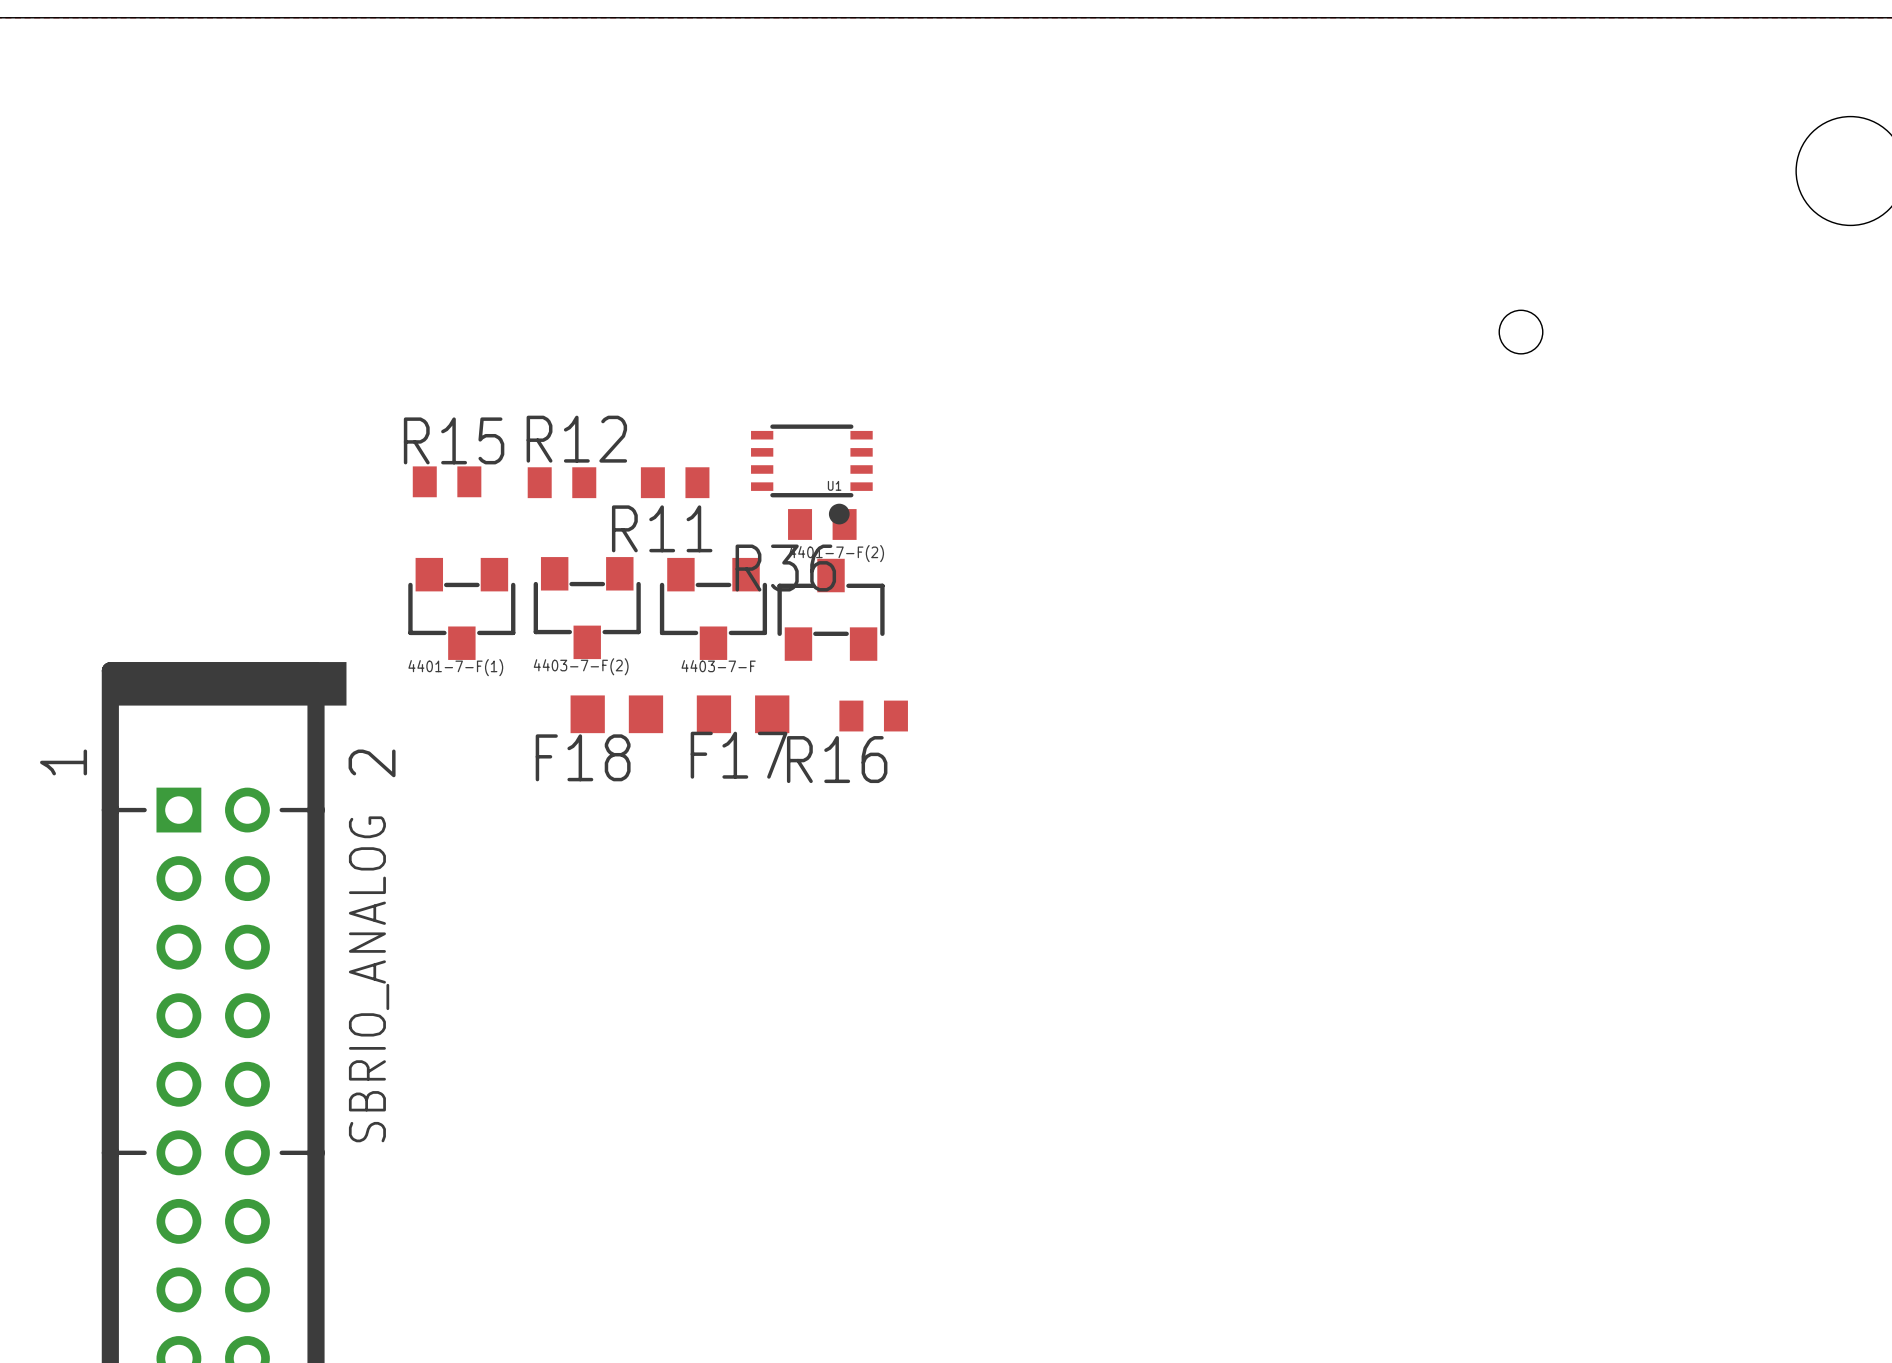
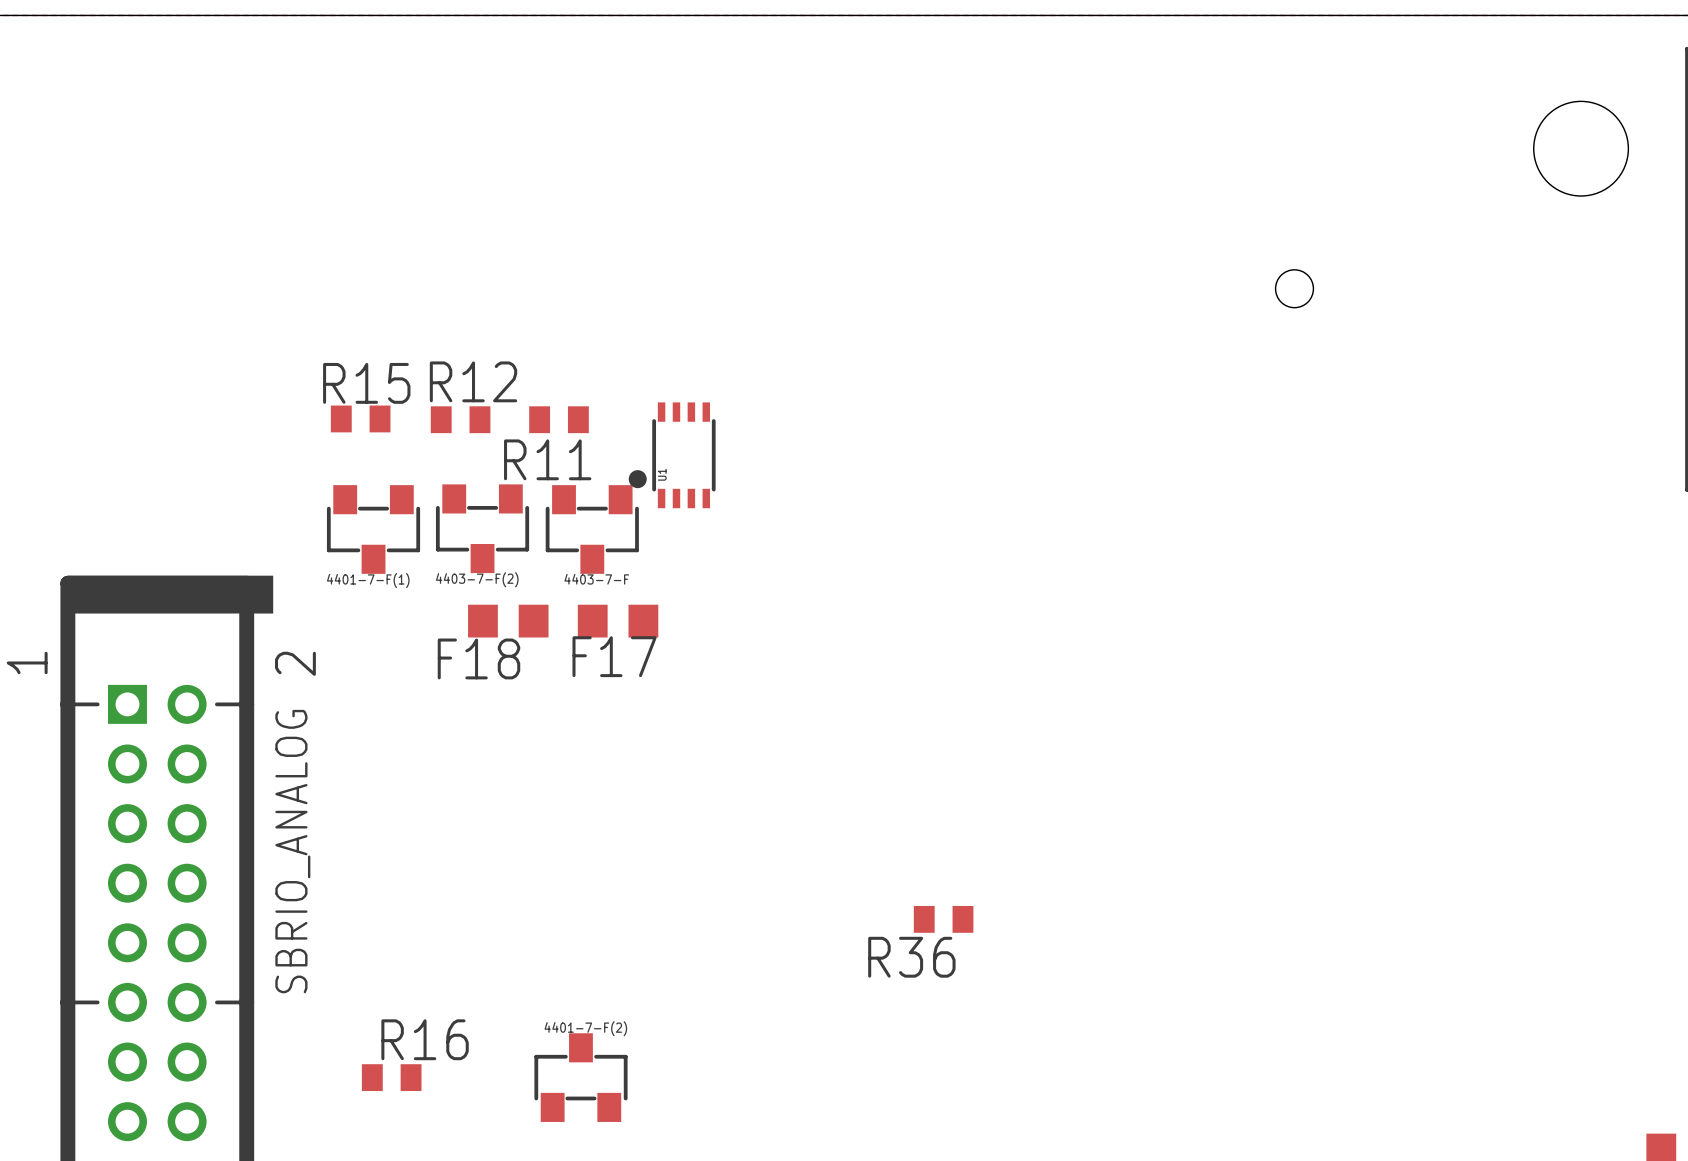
U1 rotation: 0° (811, 474) -> 90° clockwise (672, 455)
R36 position: (822, 524) -> (943, 919)
4401-7-F(2) position: (831, 609) -> (580, 1077)
R16 position: (873, 716) -> (391, 1077)
R16 name position: R16 (837, 759) -> R16 (425, 1039)

